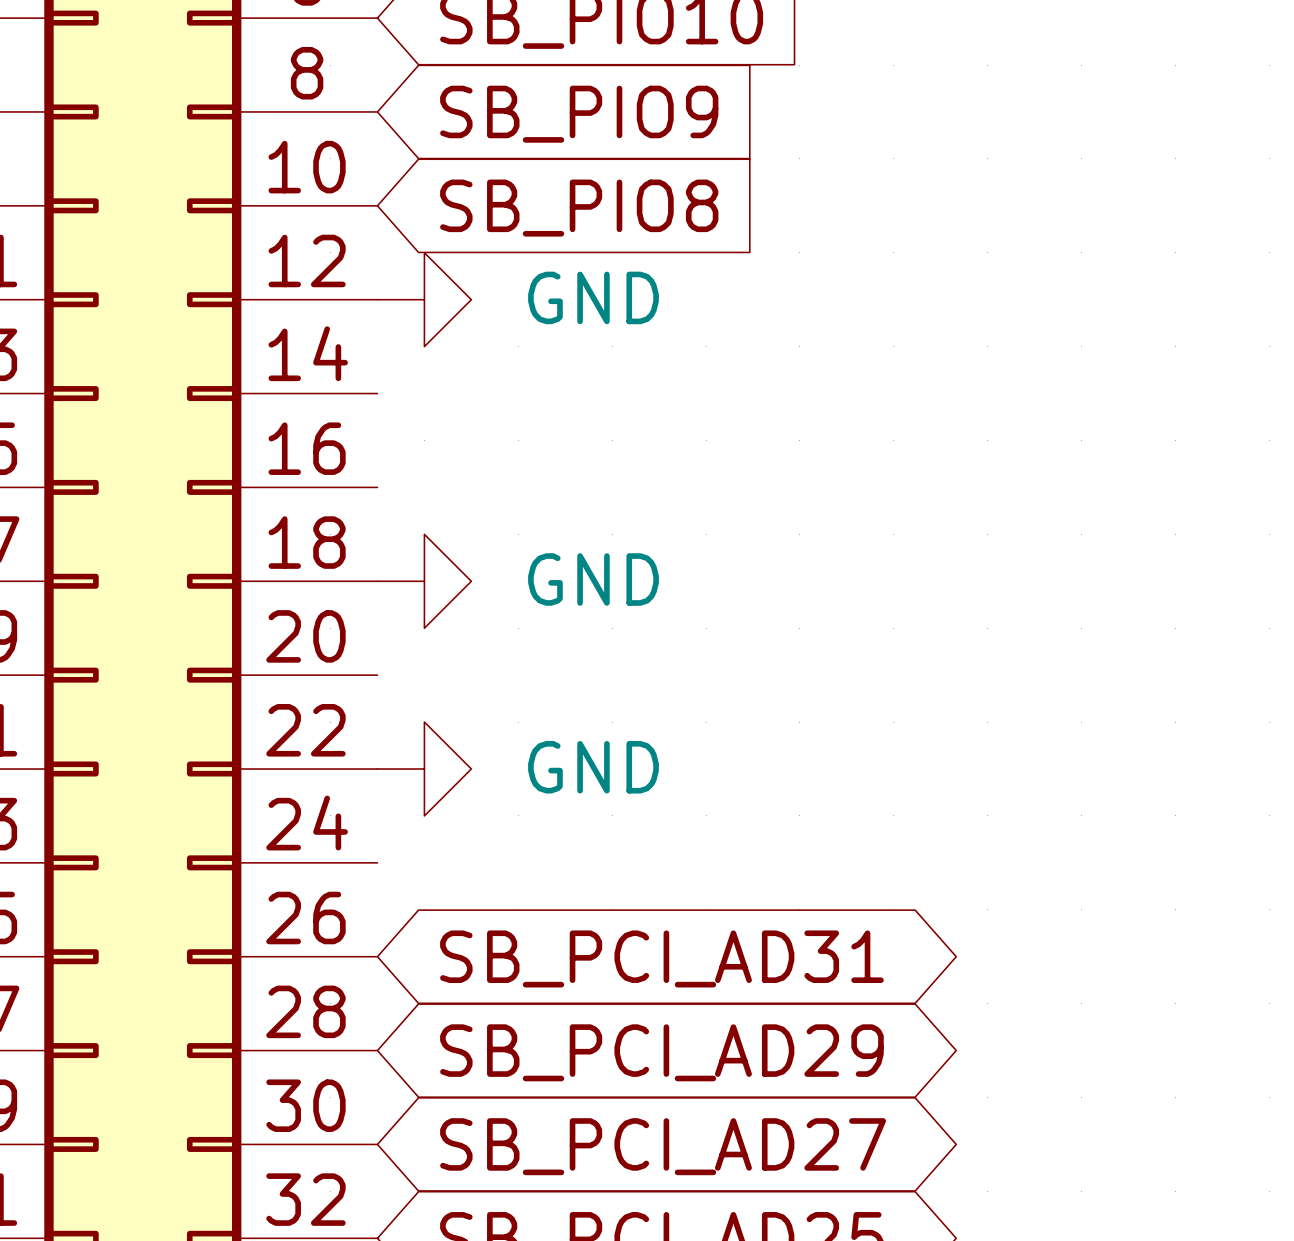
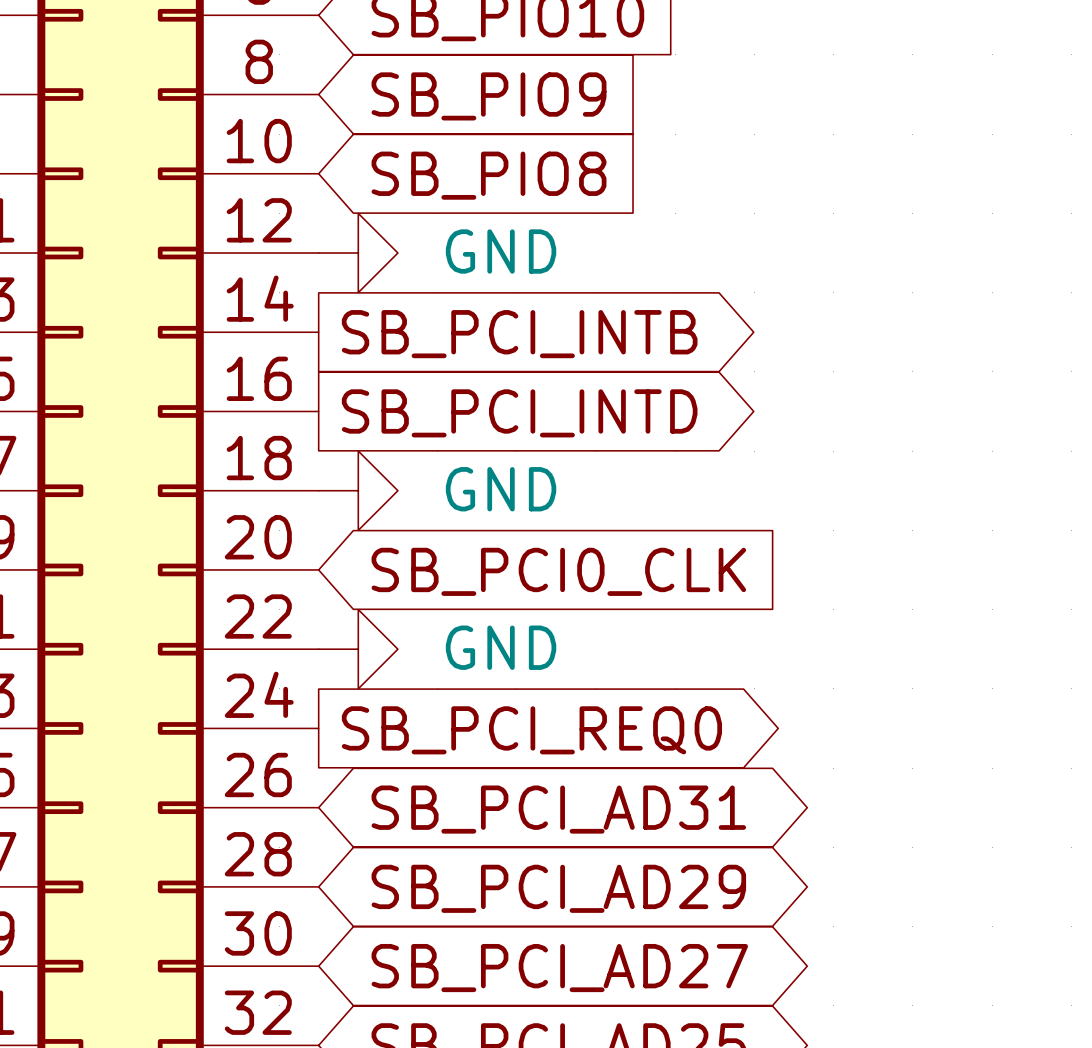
global label: none -> SB_PCI_INTB (519, 334)
global label: none -> SB_PCI_INTD (519, 413)
global label: none -> SB_PCI0_CLK (558, 571)
global label: none -> SB_PCI_REQ0 (531, 730)

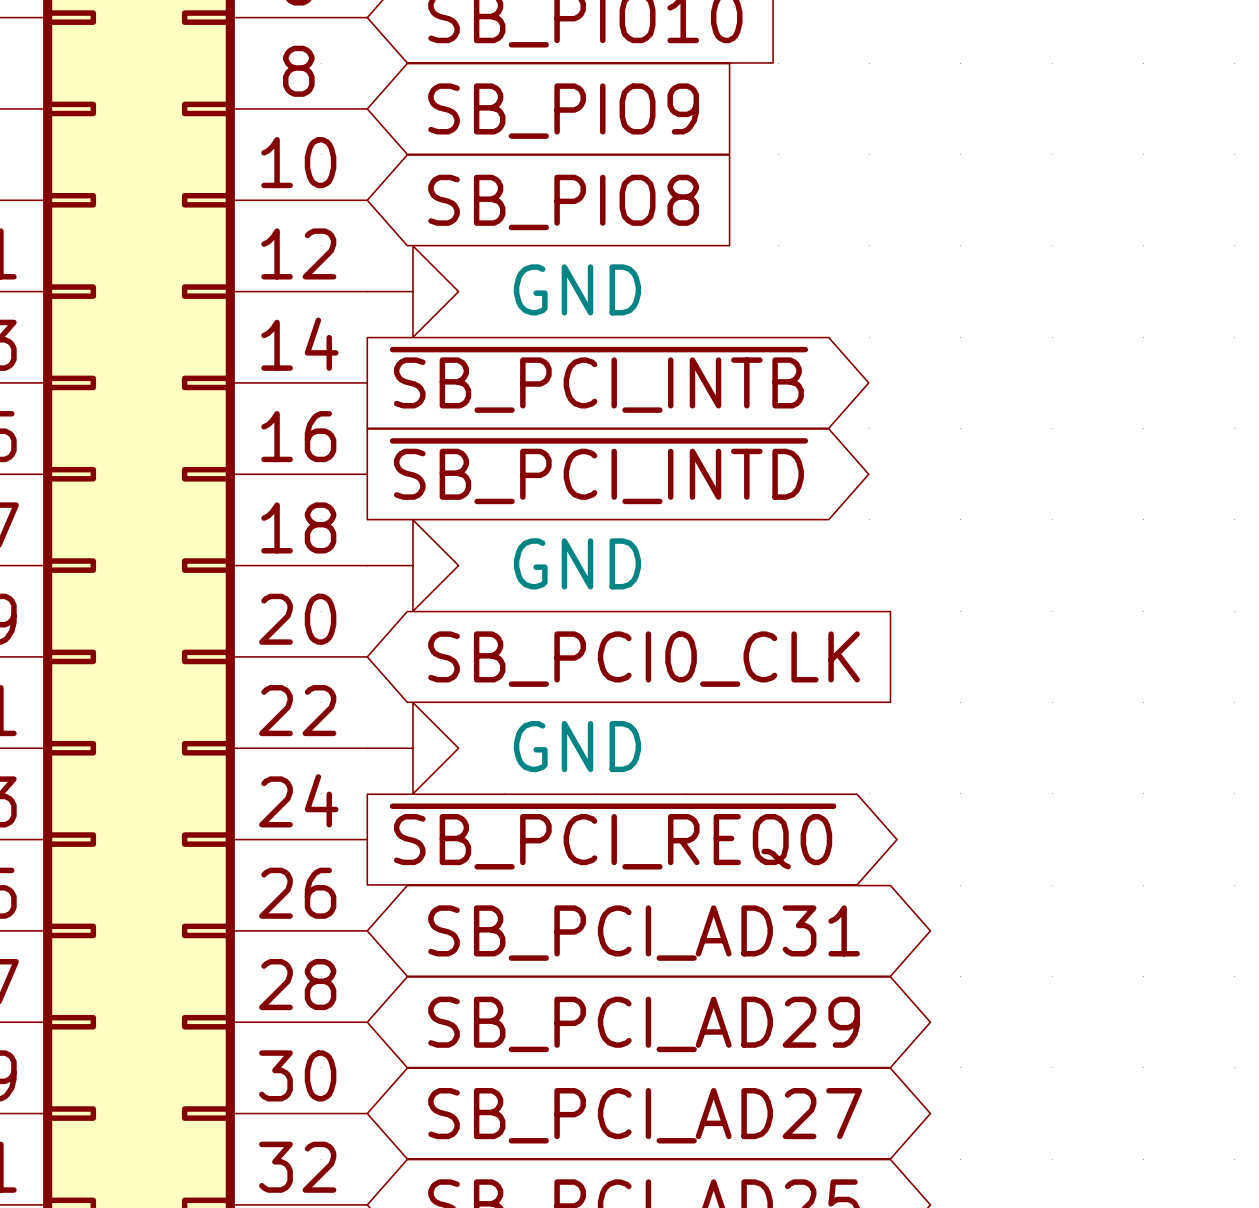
global label: SB_PCI_INTB (519, 334) -> ~{SB_PCI_INTB} (598, 379)
global label: SB_PCI_INTD (519, 413) -> ~{SB_PCI_INTD} (598, 471)
global label: SB_PCI_REQ0 (531, 730) -> ~{SB_PCI_REQ0} (613, 836)

